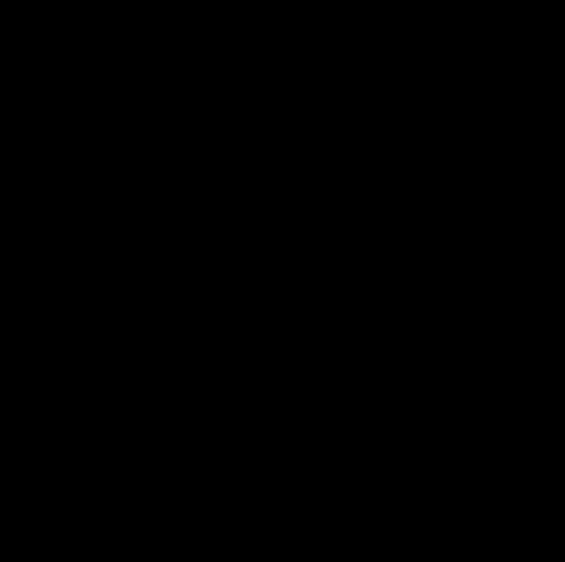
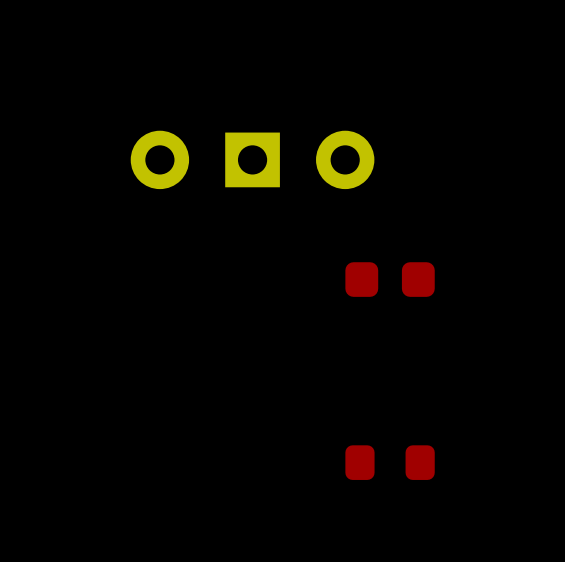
part: none -> (252, 159)
part: none -> (390, 279)
part: none -> (390, 462)

